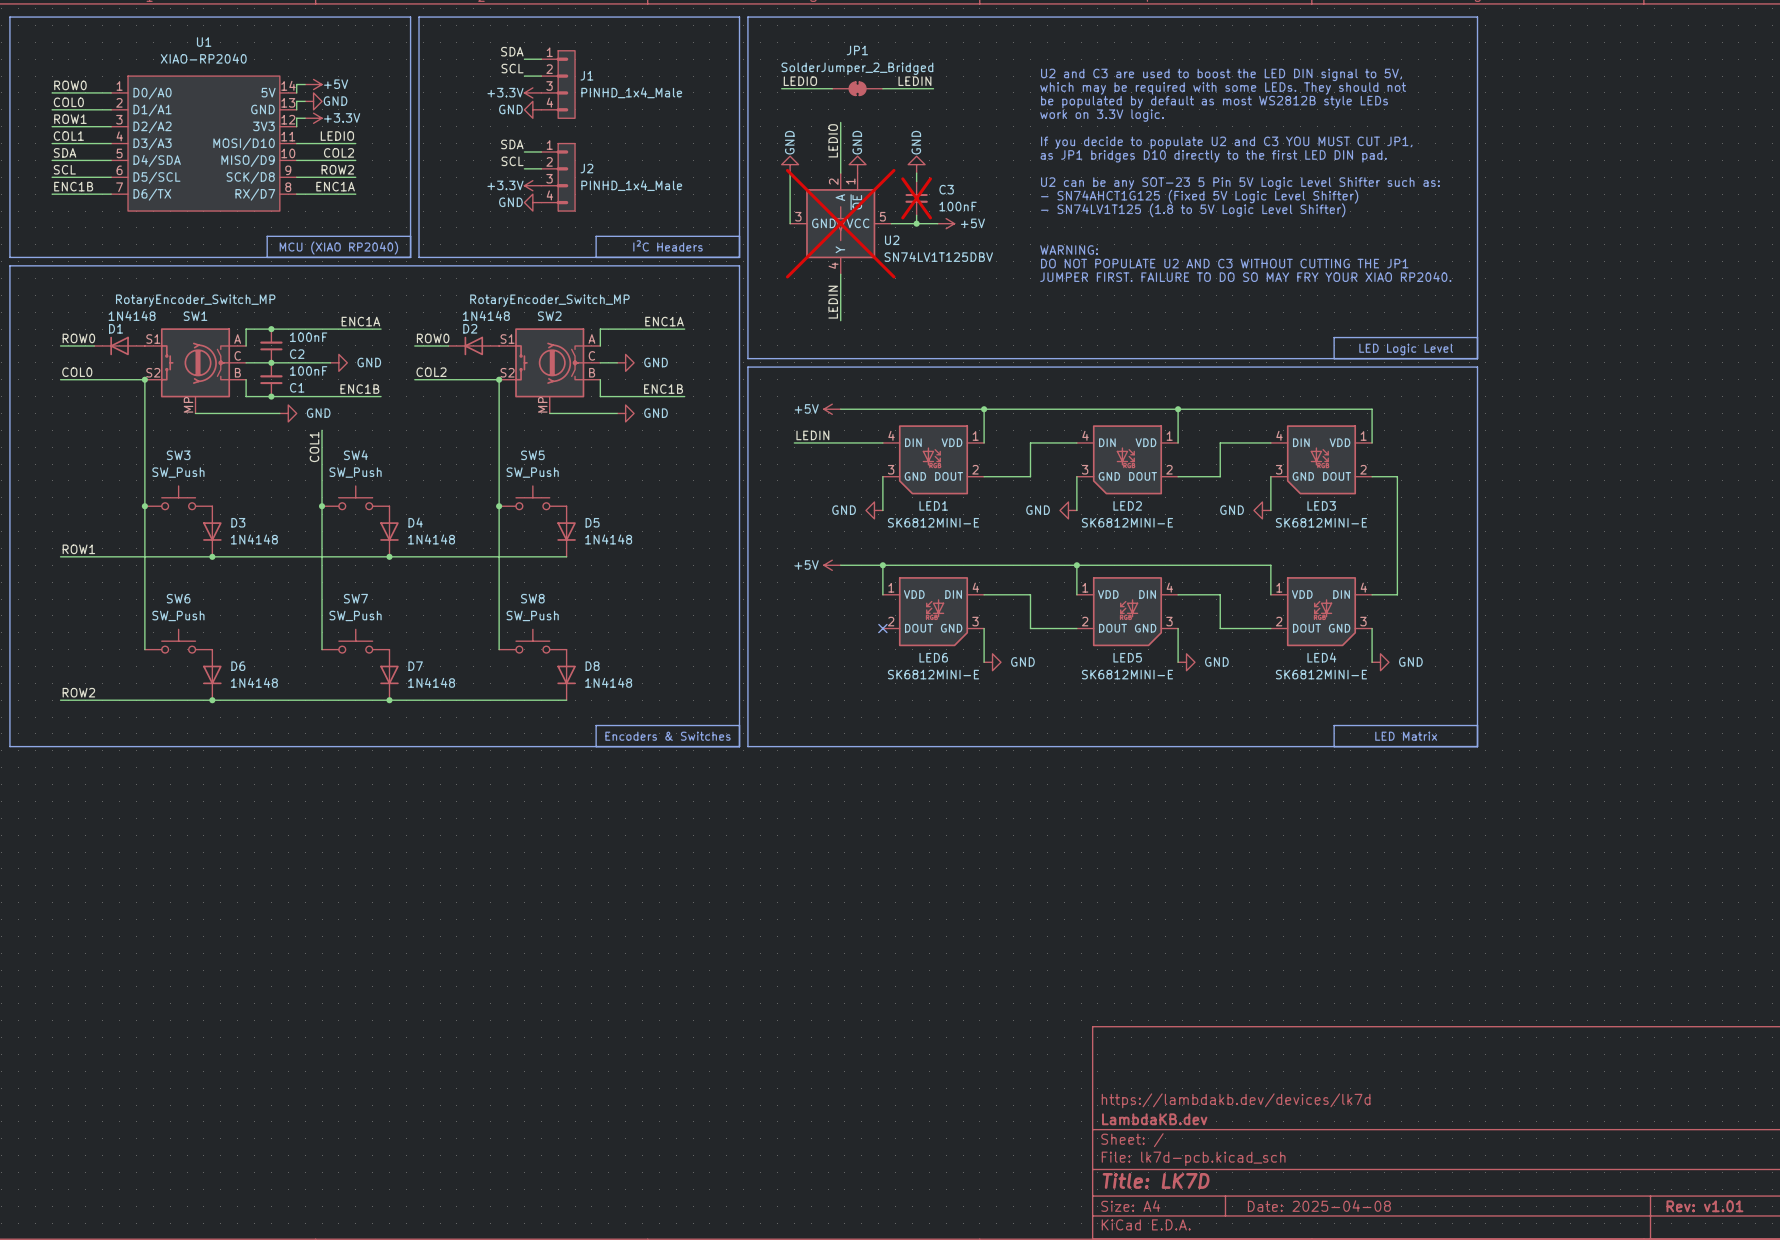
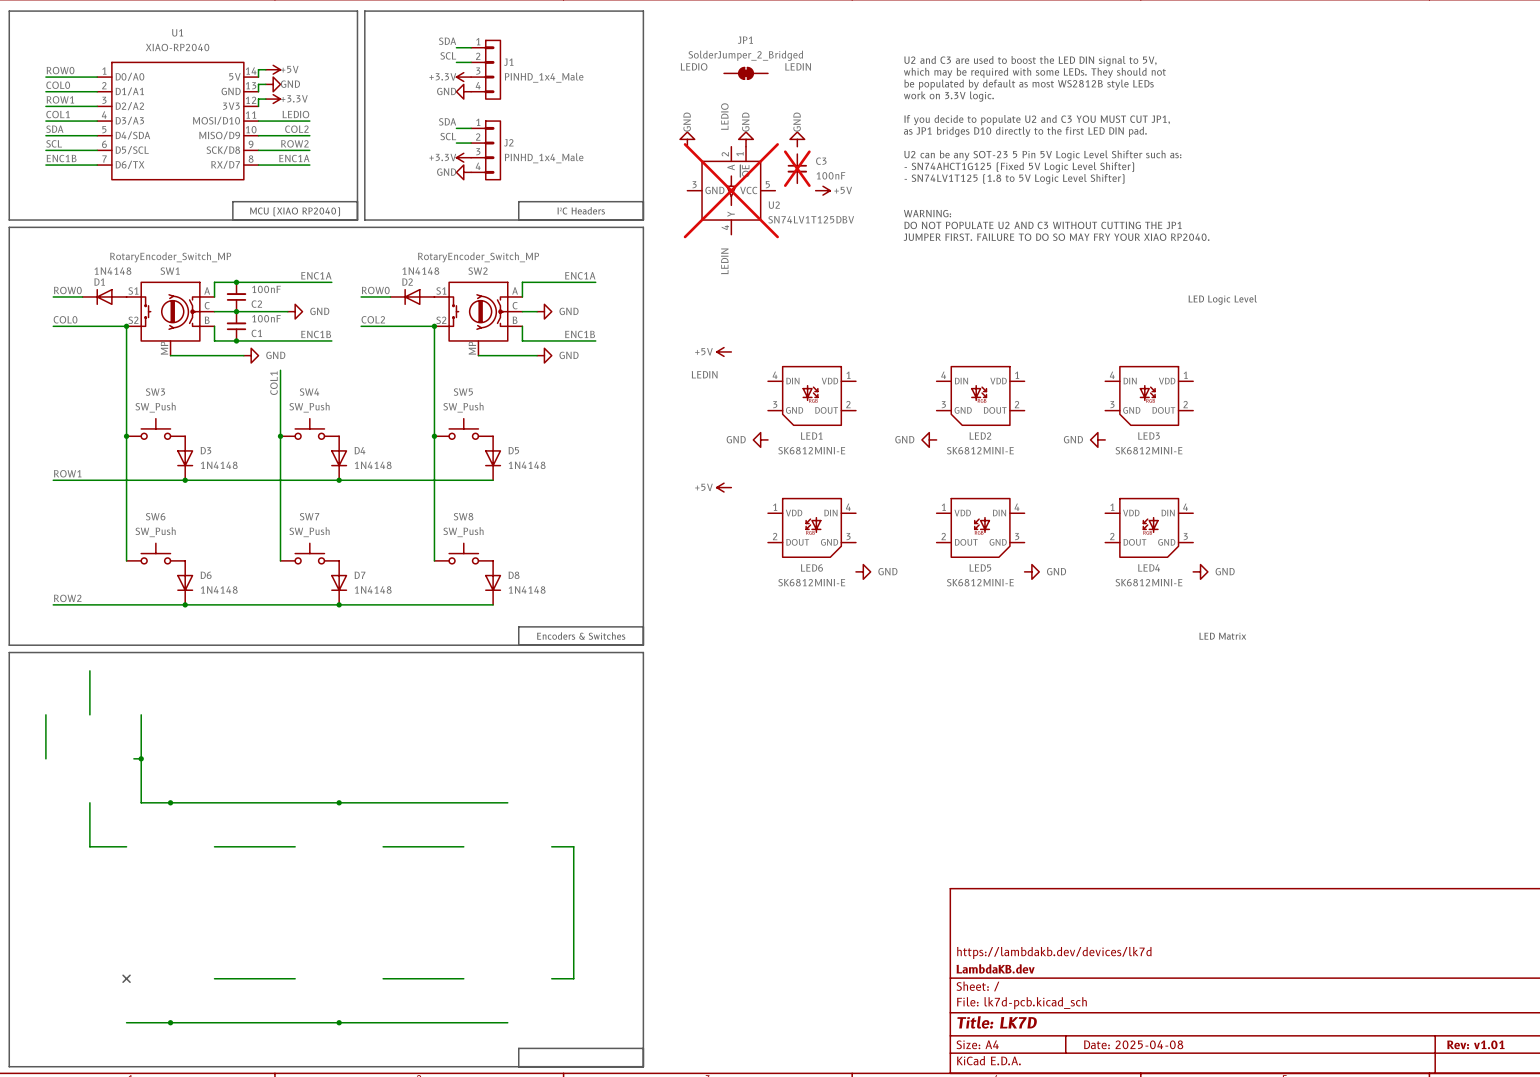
line: (747, 17) (1477, 17) (1477, 358) (747, 358) (747, 17) -> none
wire: (781, 88) (832, 88) -> none
wire: (882, 88) (933, 88) -> none
wire: (840, 122) (840, 173) -> none
wire: (790, 173) (790, 223) -> none
wire: (916, 173) (916, 181) -> none
wire: (916, 215) (916, 223) -> none
wire: (891, 223) (937, 223) -> none
junction: (916, 223) -> none
wire: (840, 274) (840, 320) -> none
line: (1477, 337) (1334, 337) (1334, 358) -> none
line: (747, 367) (747, 746) (1477, 746) (1477, 367) (747, 367) -> none
wire: (840, 409) (1372, 409) (1372, 442) -> none
wire: (984, 409) (984, 442) -> none
junction: (984, 409) -> none
wire: (1178, 409) (1178, 442) -> none
junction: (1178, 409) -> none
wire: (794, 442) (882, 442) -> none
wire: (1076, 442) (1030, 442) (1030, 476) (984, 476) -> none
wire: (1270, 442) (1220, 442) (1220, 476) (1178, 476) -> none
wire: (882, 476) (882, 510) -> none
wire: (1076, 476) (1076, 510) -> none
wire: (1270, 476) (1270, 510) -> none
wire: (1372, 476) (1397, 476) (1397, 594) (1372, 594) -> none
wire: (840, 565) (1270, 565) (1270, 594) -> none
wire: (882, 565) (882, 594) -> none
junction: (882, 565) -> none
wire: (1076, 565) (1076, 594) -> none
junction: (1076, 565) -> none
wire: (984, 594) (1030, 594) (1030, 628) (1076, 628) -> none
wire: (1178, 594) (1220, 594) (1220, 628) (1270, 628) -> none
no-connect mark: (882, 628) -> none
wire: (984, 628) (984, 662) -> none
wire: (1178, 628) (1178, 662) -> none
wire: (1372, 628) (1372, 662) -> none
line: (1477, 725) (1334, 725) (1334, 746) -> none
line: none -> (9, 652) (643, 652) (643, 1066) (9, 1066) (9, 652)
wire: none -> (89, 670) (89, 714)
wire: none -> (45, 714) (45, 758)
wire: none -> (141, 714) (141, 802) (507, 802)
wire: none -> (133, 758) (141, 758)
junction: none -> (141, 758)
wire: none -> (89, 802) (89, 846) (126, 846)
junction: none -> (170, 802)
junction: none -> (339, 802)
wire: none -> (214, 846) (295, 846)
wire: none -> (383, 846) (463, 846)
wire: none -> (551, 846) (573, 846) (573, 978) (551, 978)
no-connect mark: none -> (126, 978)
wire: none -> (214, 978) (295, 978)
wire: none -> (383, 978) (463, 978)
wire: none -> (126, 1022) (507, 1022)
junction: none -> (170, 1022)
junction: none -> (339, 1022)
line: none -> (643, 1048) (518, 1048) (518, 1066)

